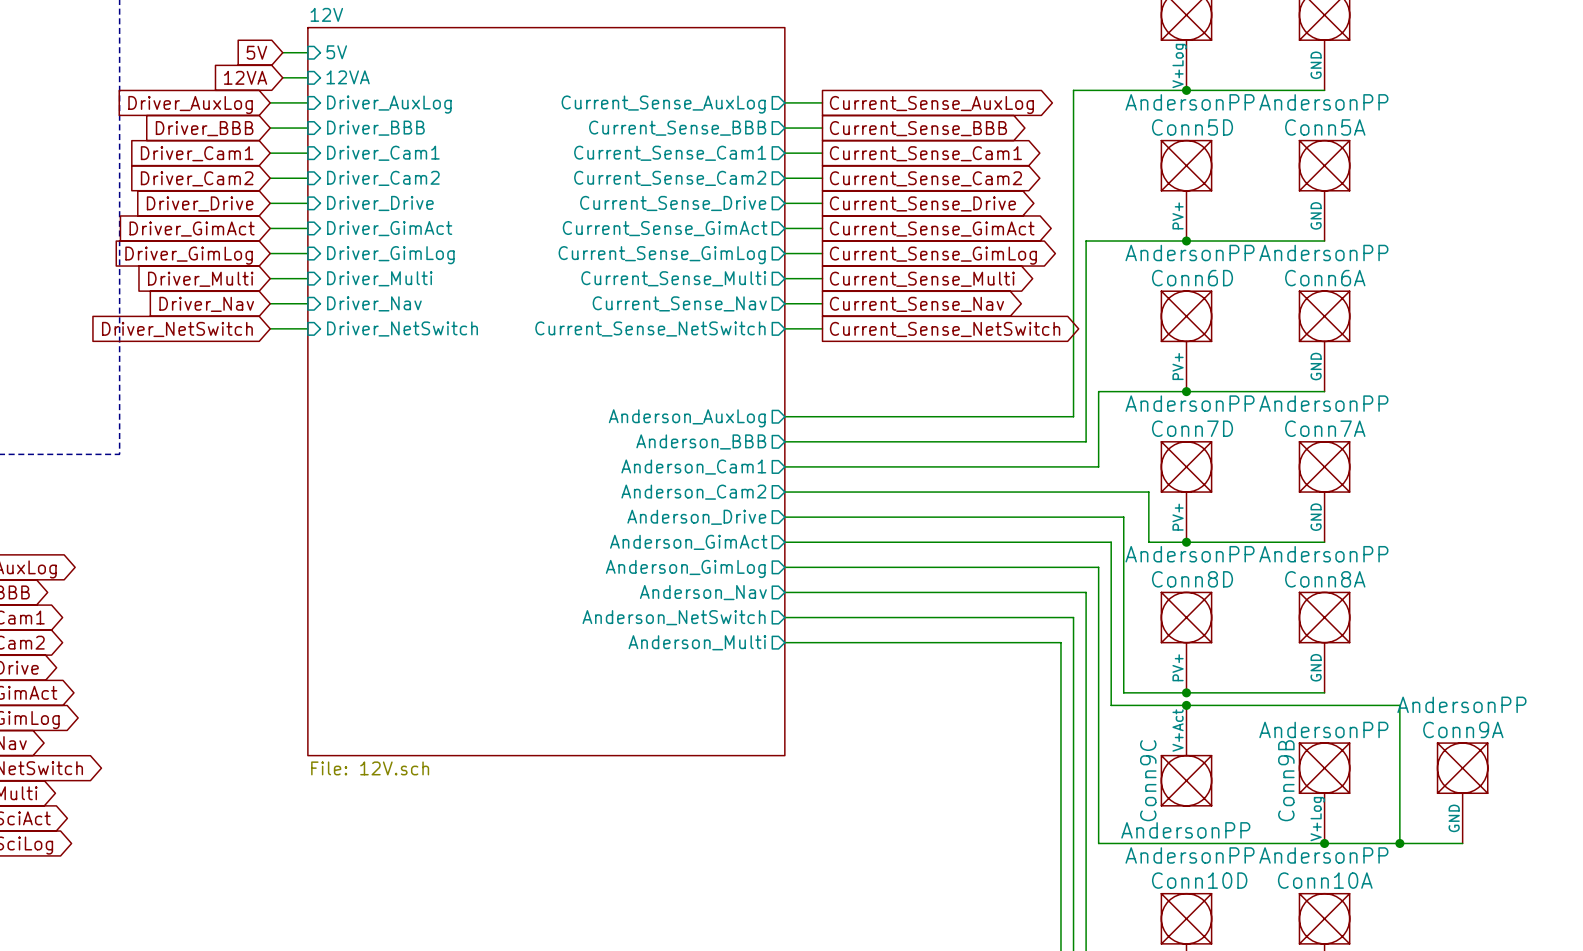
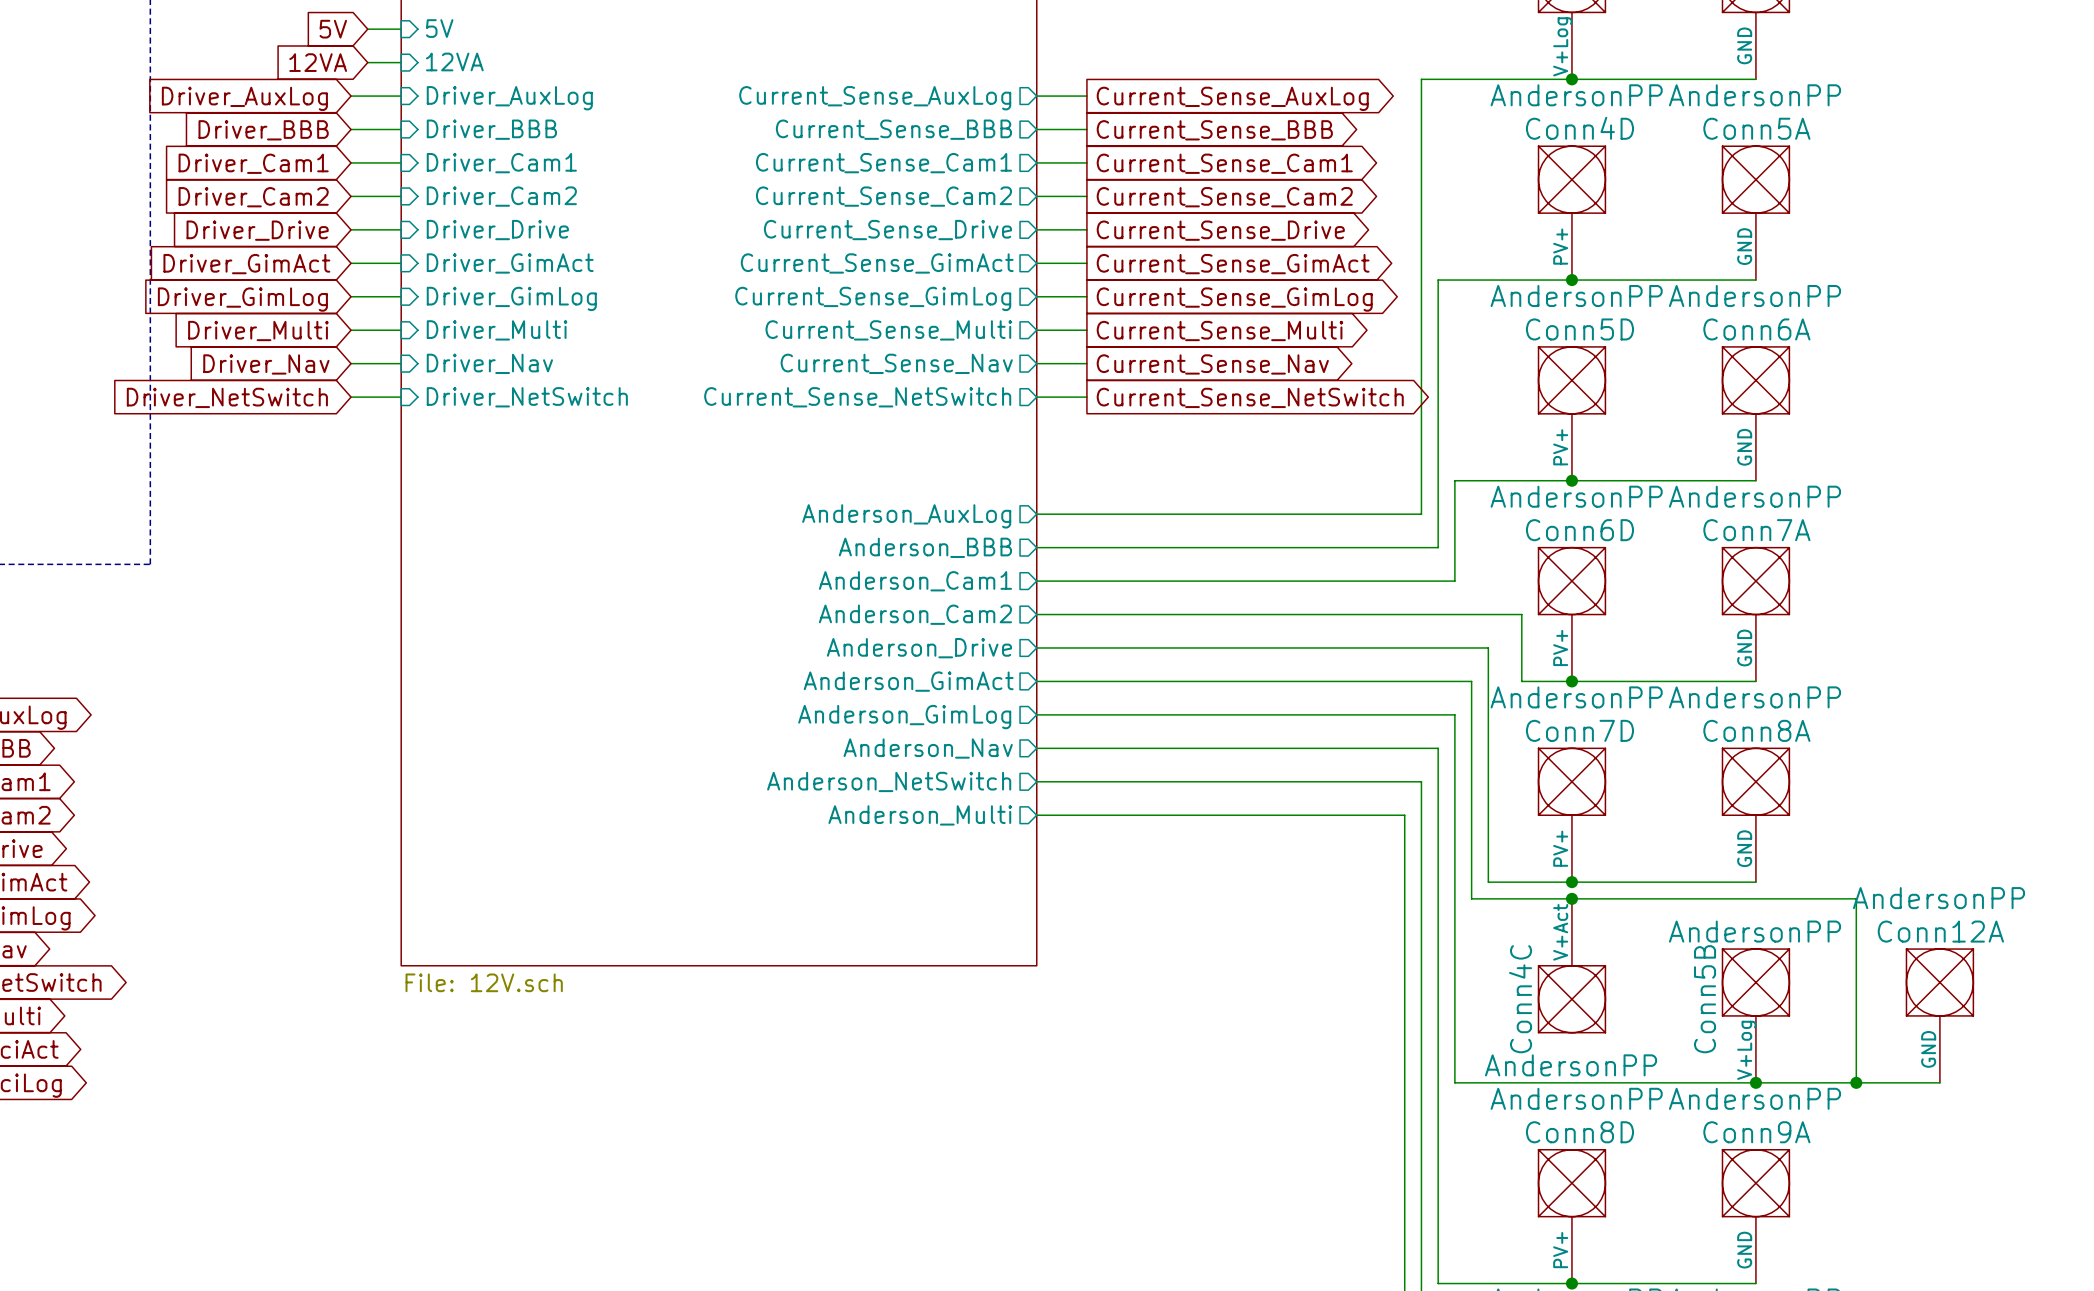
Conn5D name: Conn5D (1192, 127) -> Conn4D (1579, 128)
Conn6D name: Conn6D (1192, 278) -> Conn5D (1579, 329)
Conn7D name: Conn7D (1192, 428) -> Conn6D (1579, 530)
Conn8D name: Conn8D (1192, 579) -> Conn7D (1579, 730)
Conn9A name: Conn9A (1463, 729) -> Conn12A (1940, 931)
Conn9C name: Conn9C (1148, 780) -> Conn4C (1520, 999)
Conn9B name: Conn9B (1286, 780) -> Conn5B (1705, 999)
Conn10D name: Conn10D (1199, 880) -> Conn8D (1579, 1132)
Conn10A name: Conn10A (1325, 880) -> Conn9A (1756, 1132)

